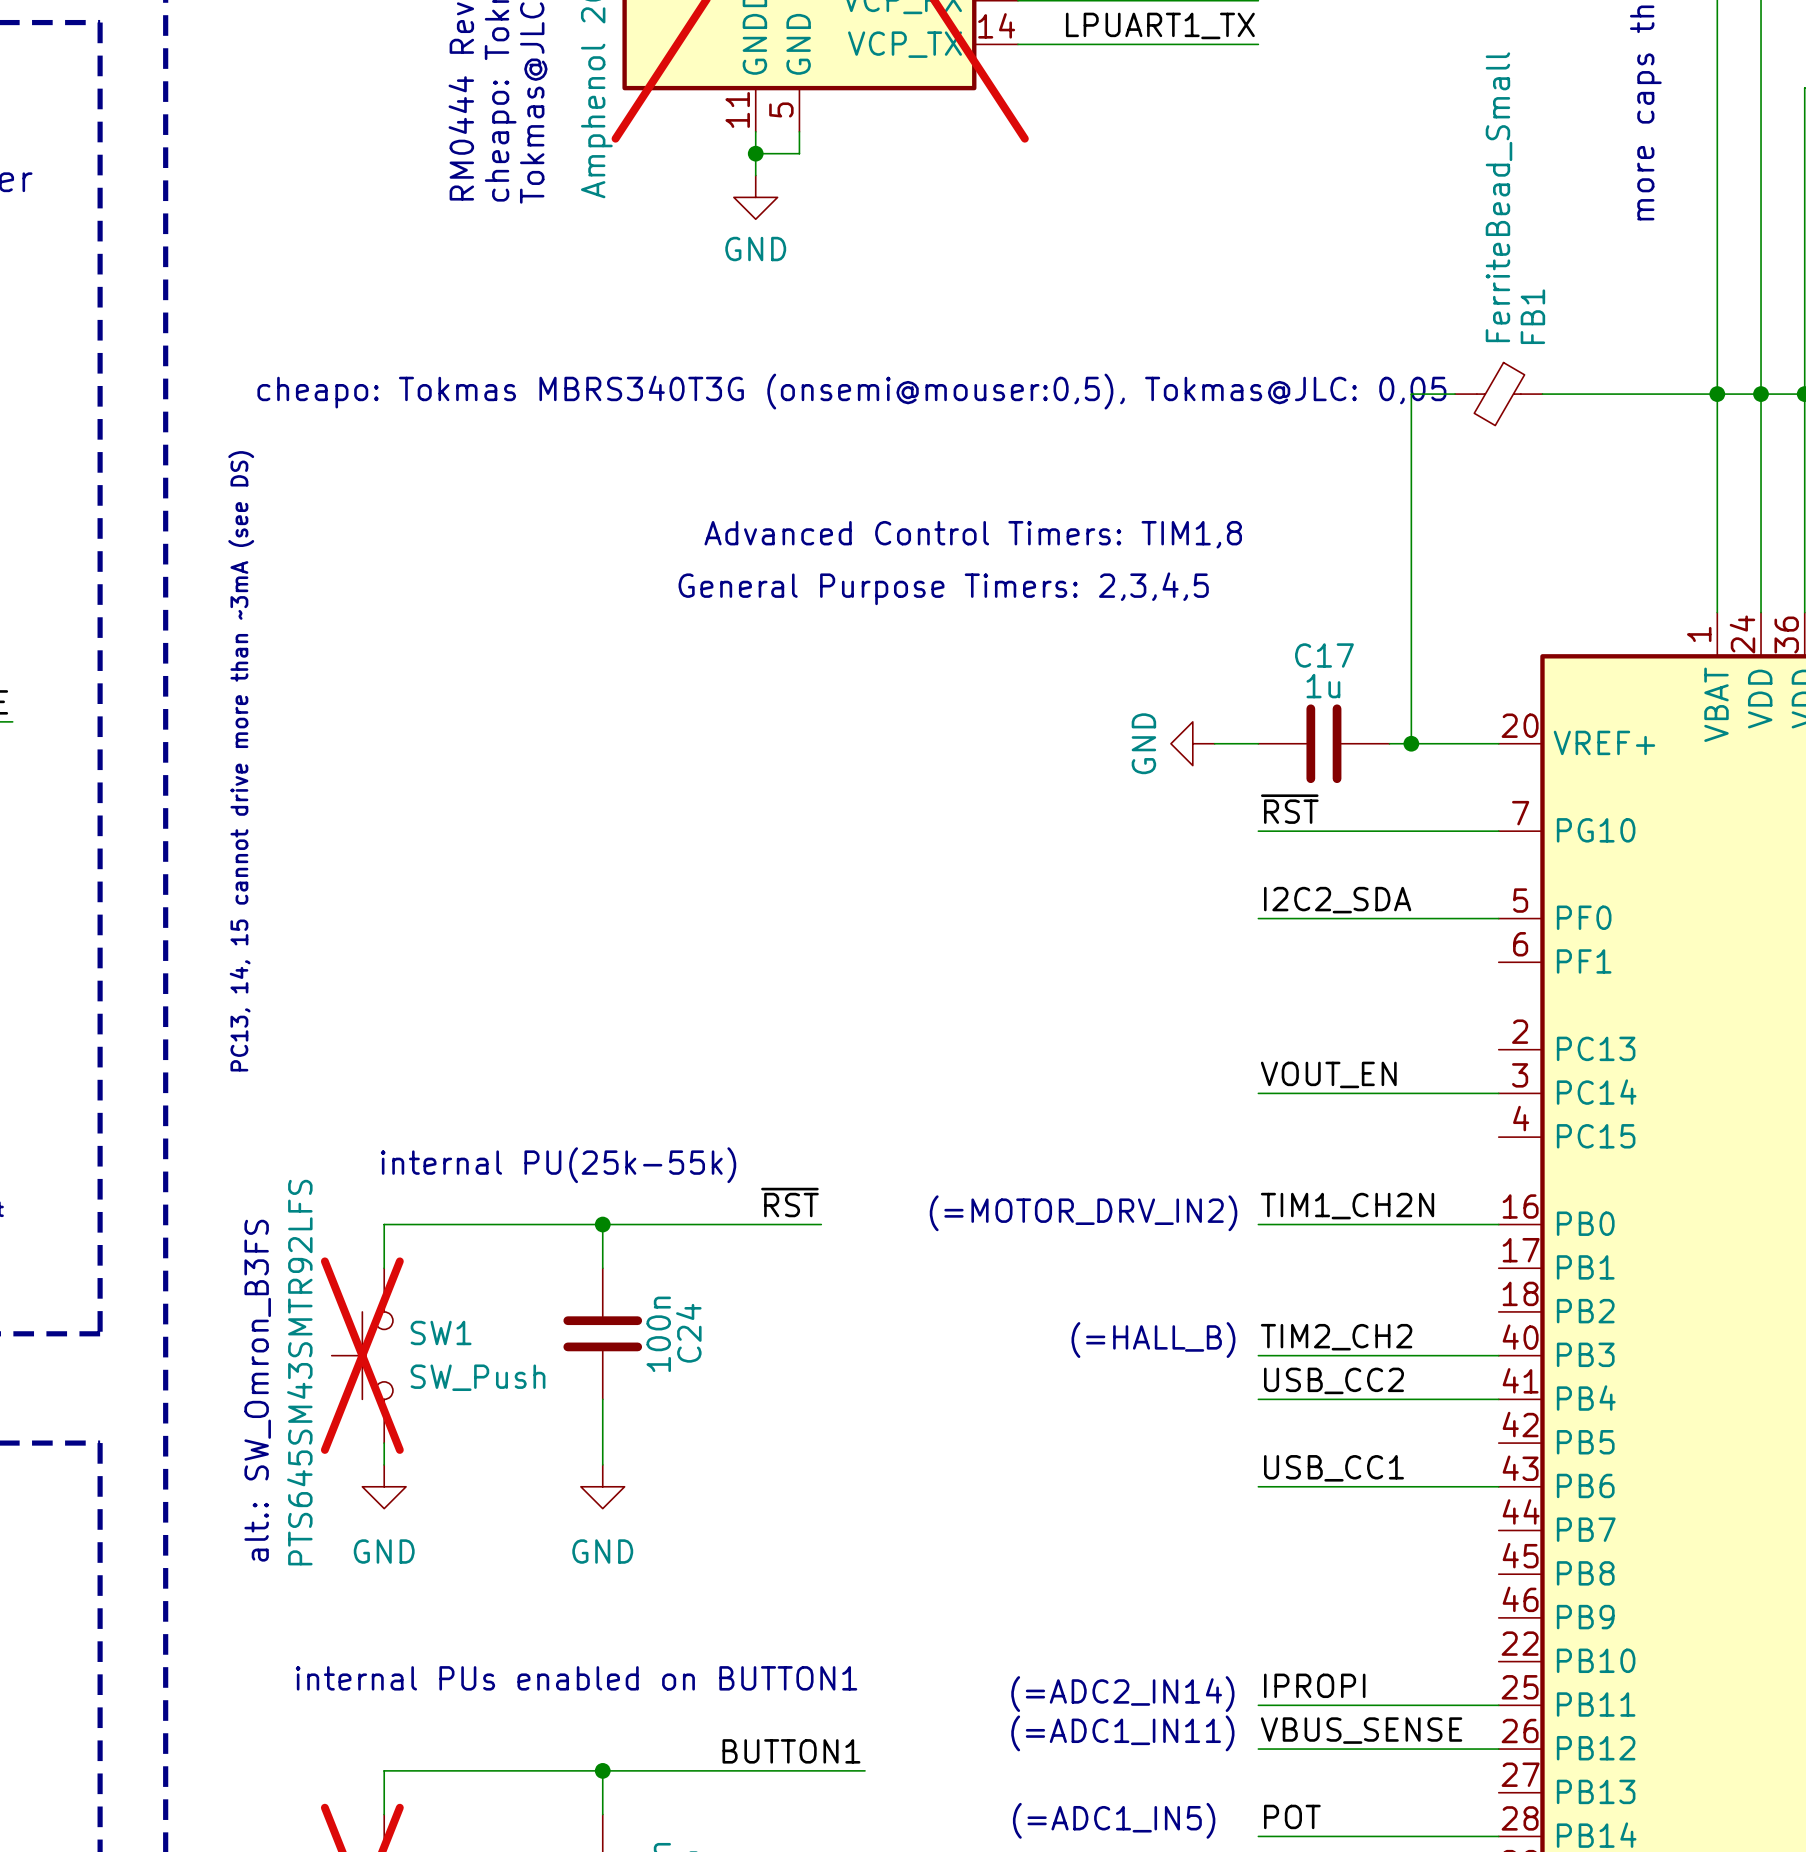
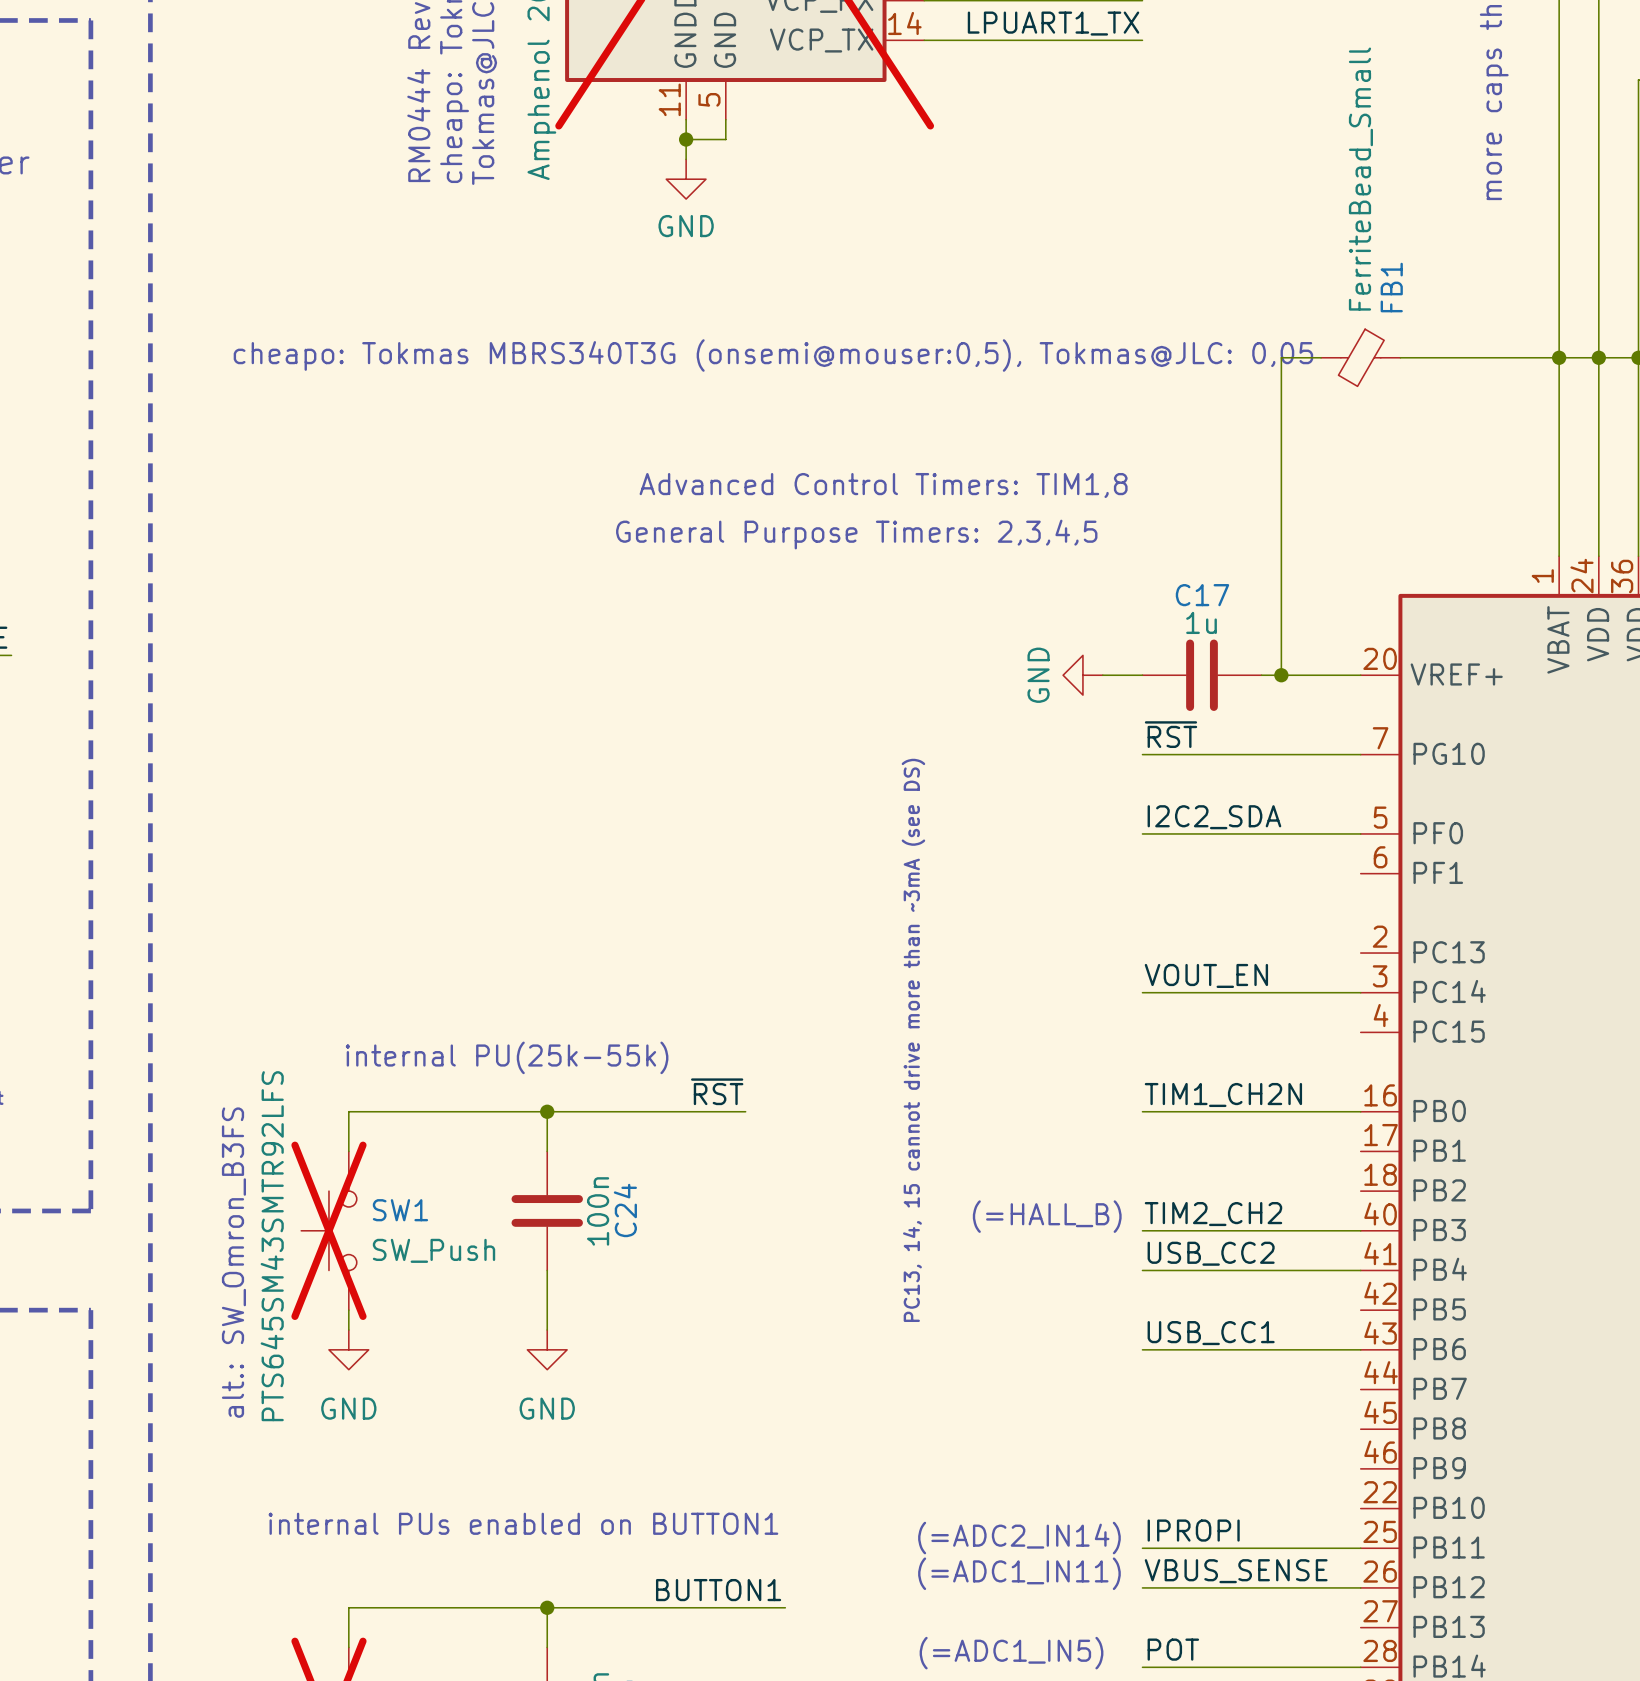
text: PC13, 14, 15 cannot drive more than ~3mA (see DS) (241, 761) -> none
text: none -> PC13, 14, 15 cannot drive more than ~3mA (see DS) (913, 1040)
text: (=MOTOR_DRV_IN2) (1083, 1213) -> none

